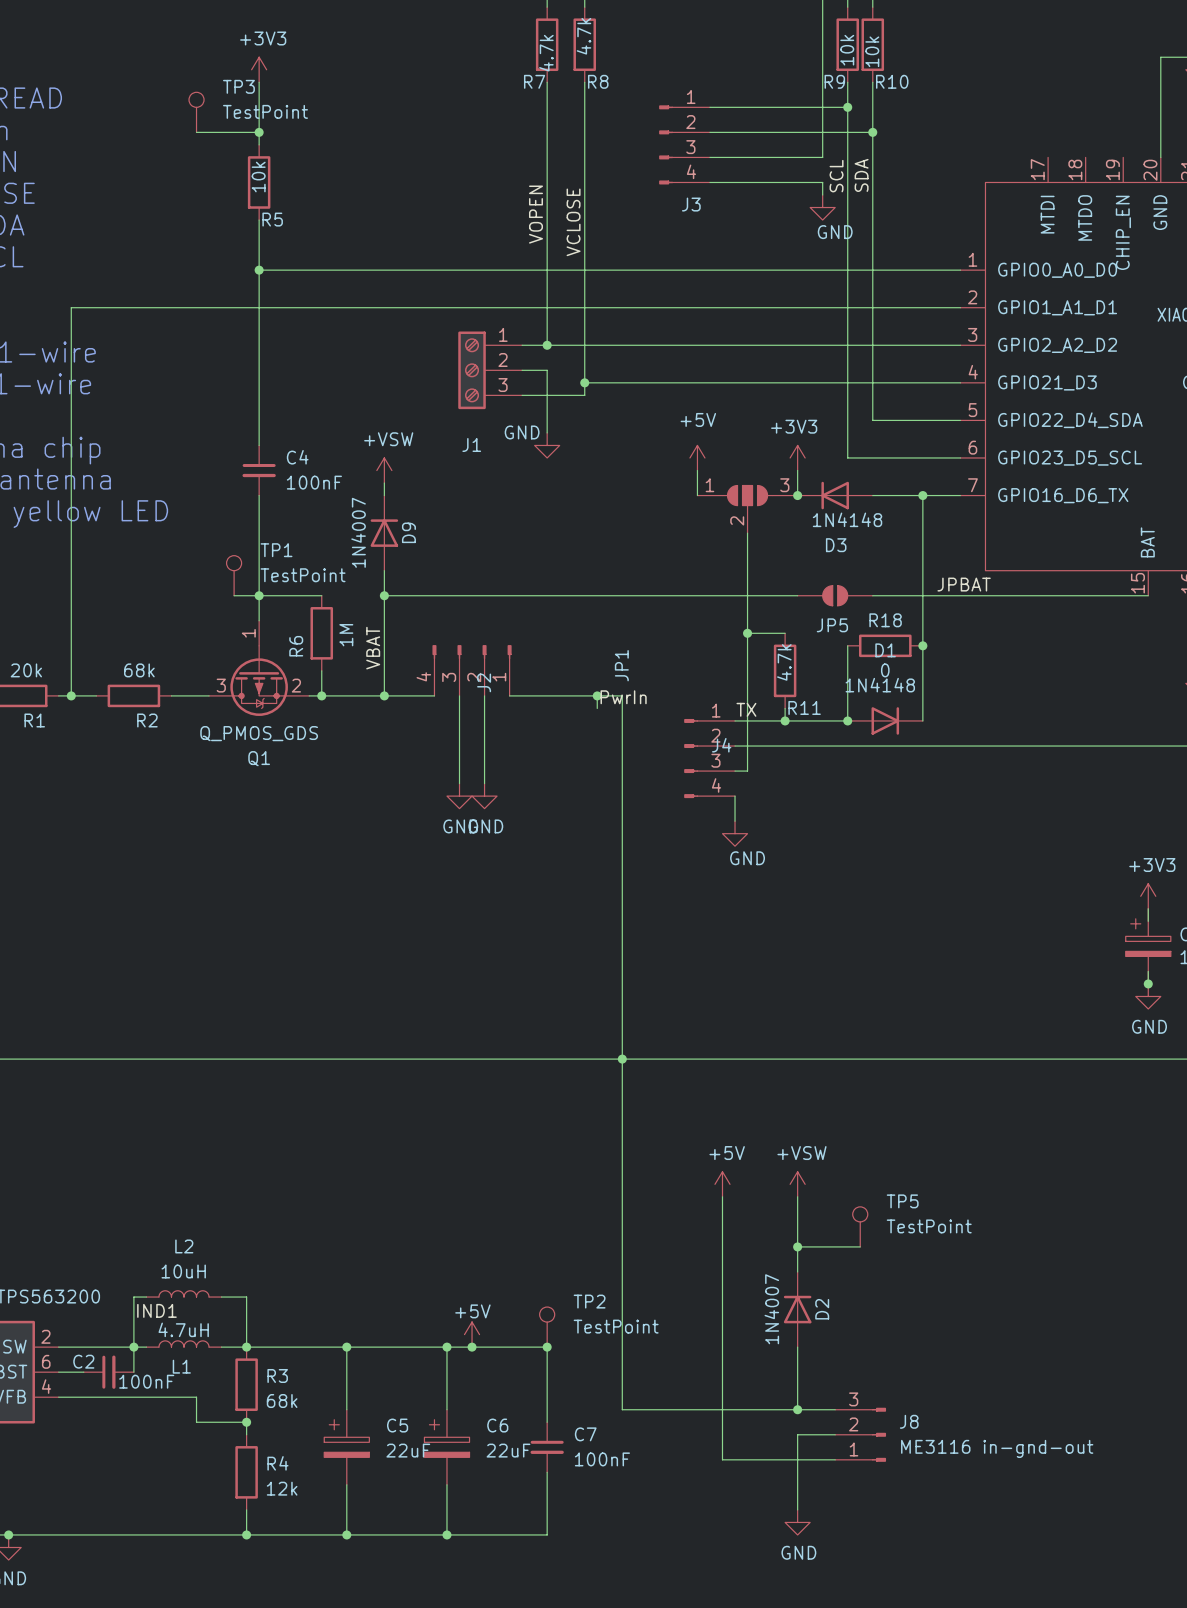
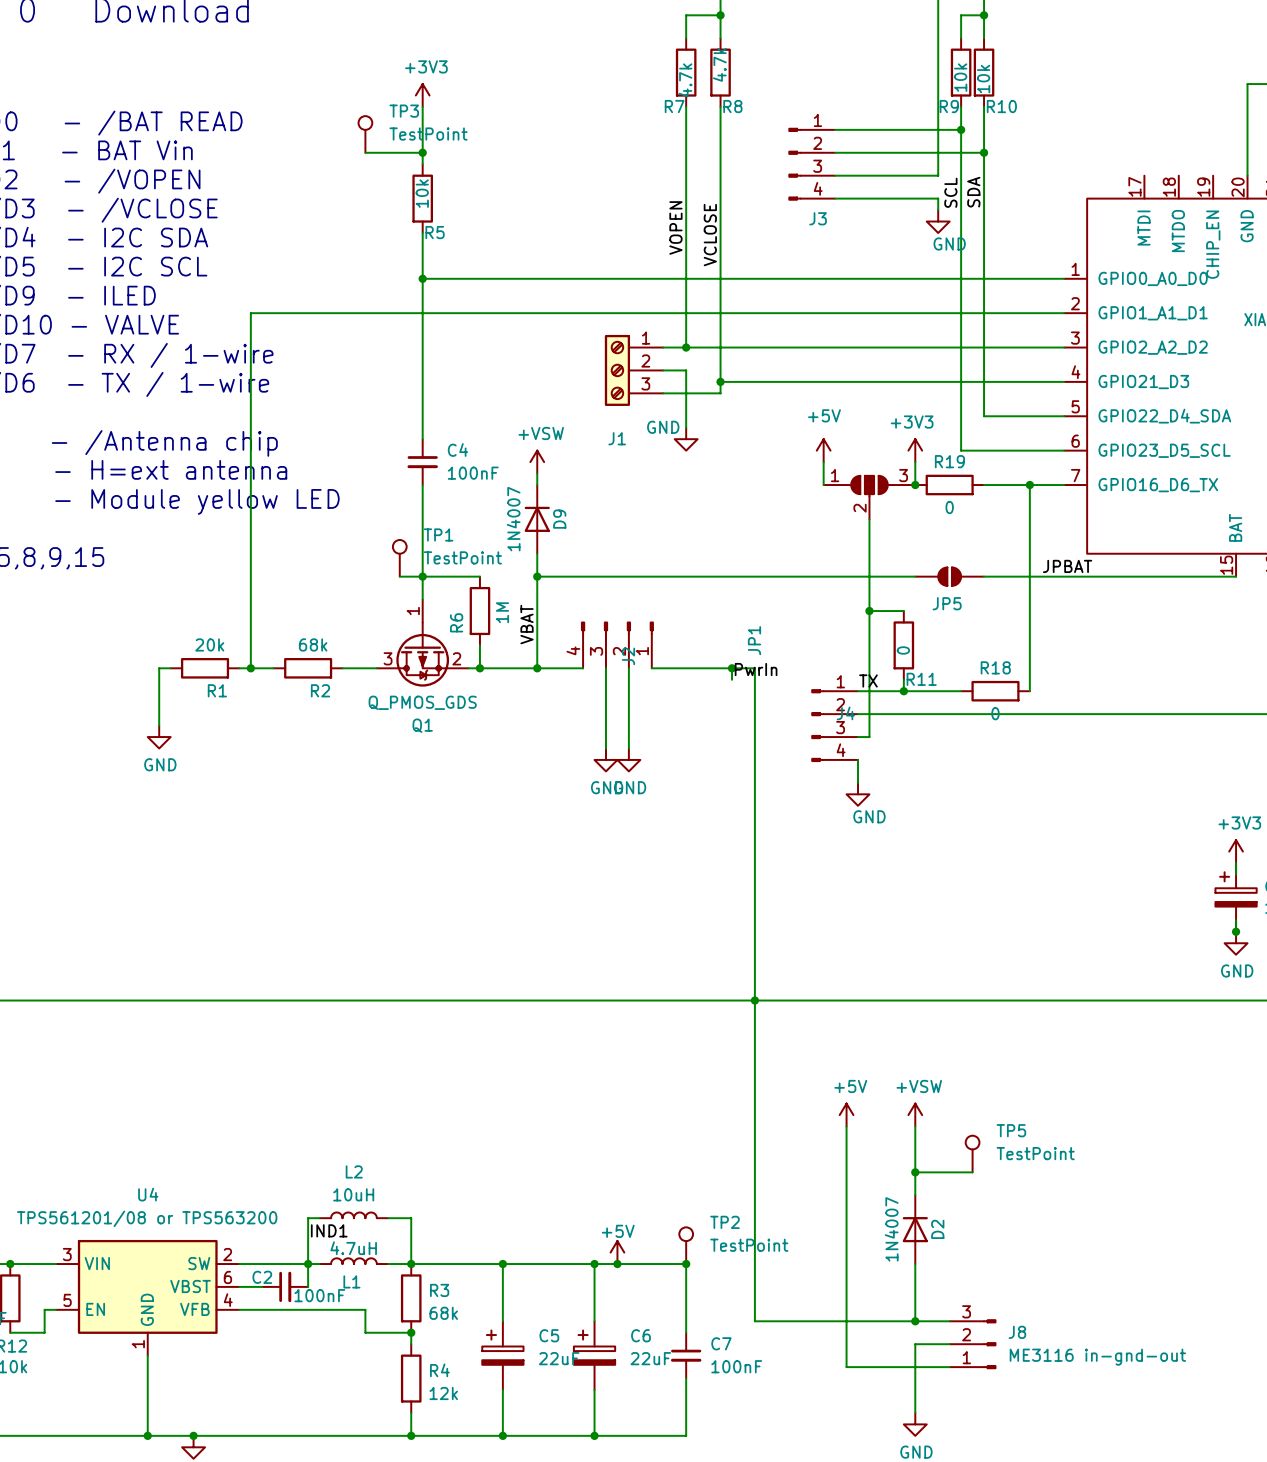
D3: 1N4148 (835, 495) -> none
R19: none -> 0 (949, 485)
wire: (847, 645) (847, 720) -> none
R18 position: (885, 645) -> (995, 691)
junction: (922, 645) -> none
R11 value: 4.7k (784, 662) -> 0 (903, 650)
junction: (847, 720) -> none
D1: 1N4148 (885, 720) -> none

